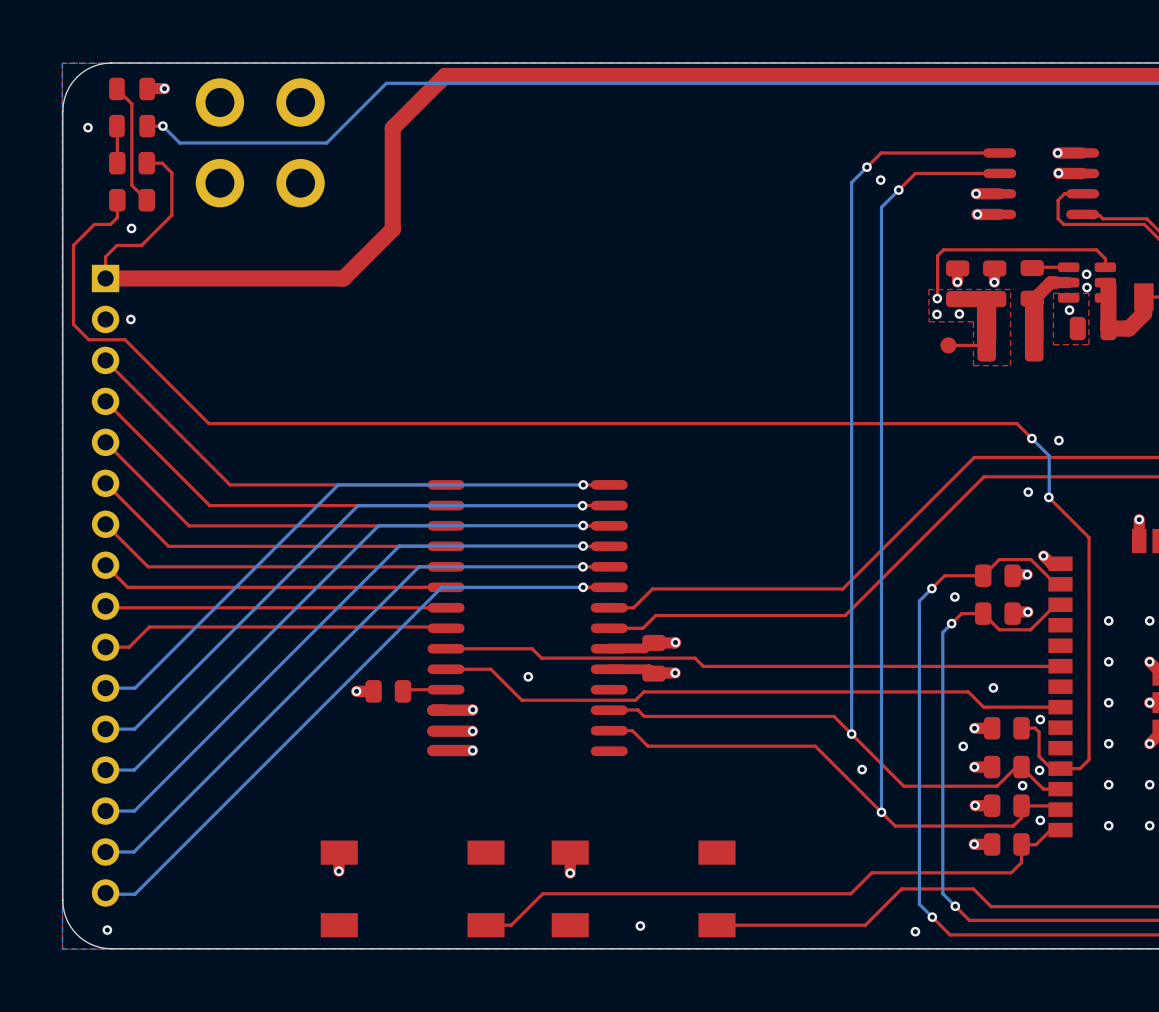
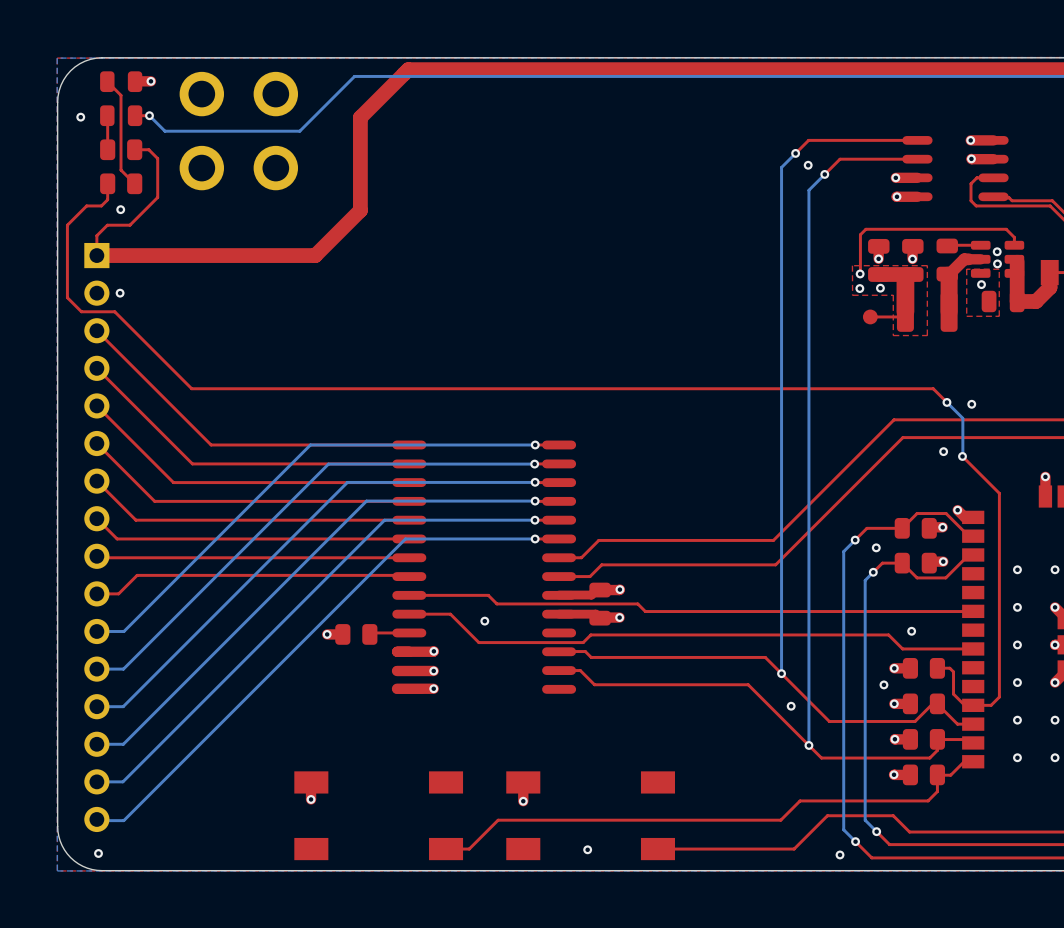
via: (1040, 719) -> none
via: (1039, 770) -> none
via: (1022, 785) -> none
via: (1040, 820) -> none

